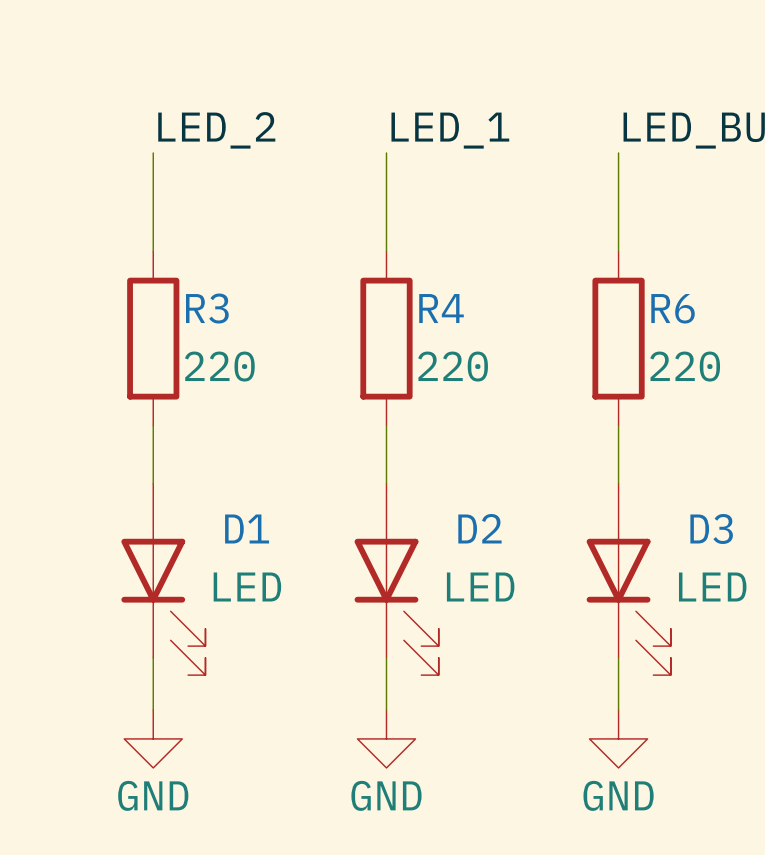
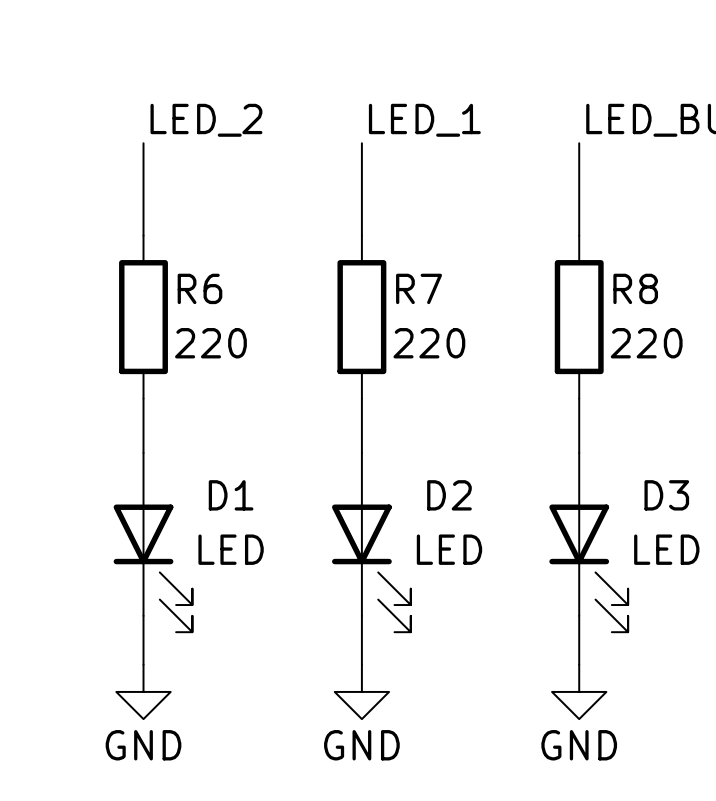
R3 name: R3 (207, 308) -> R6 (199, 288)
R4 name: R4 (441, 308) -> R7 (419, 288)
R6 name: R6 (673, 308) -> R8 (635, 288)

